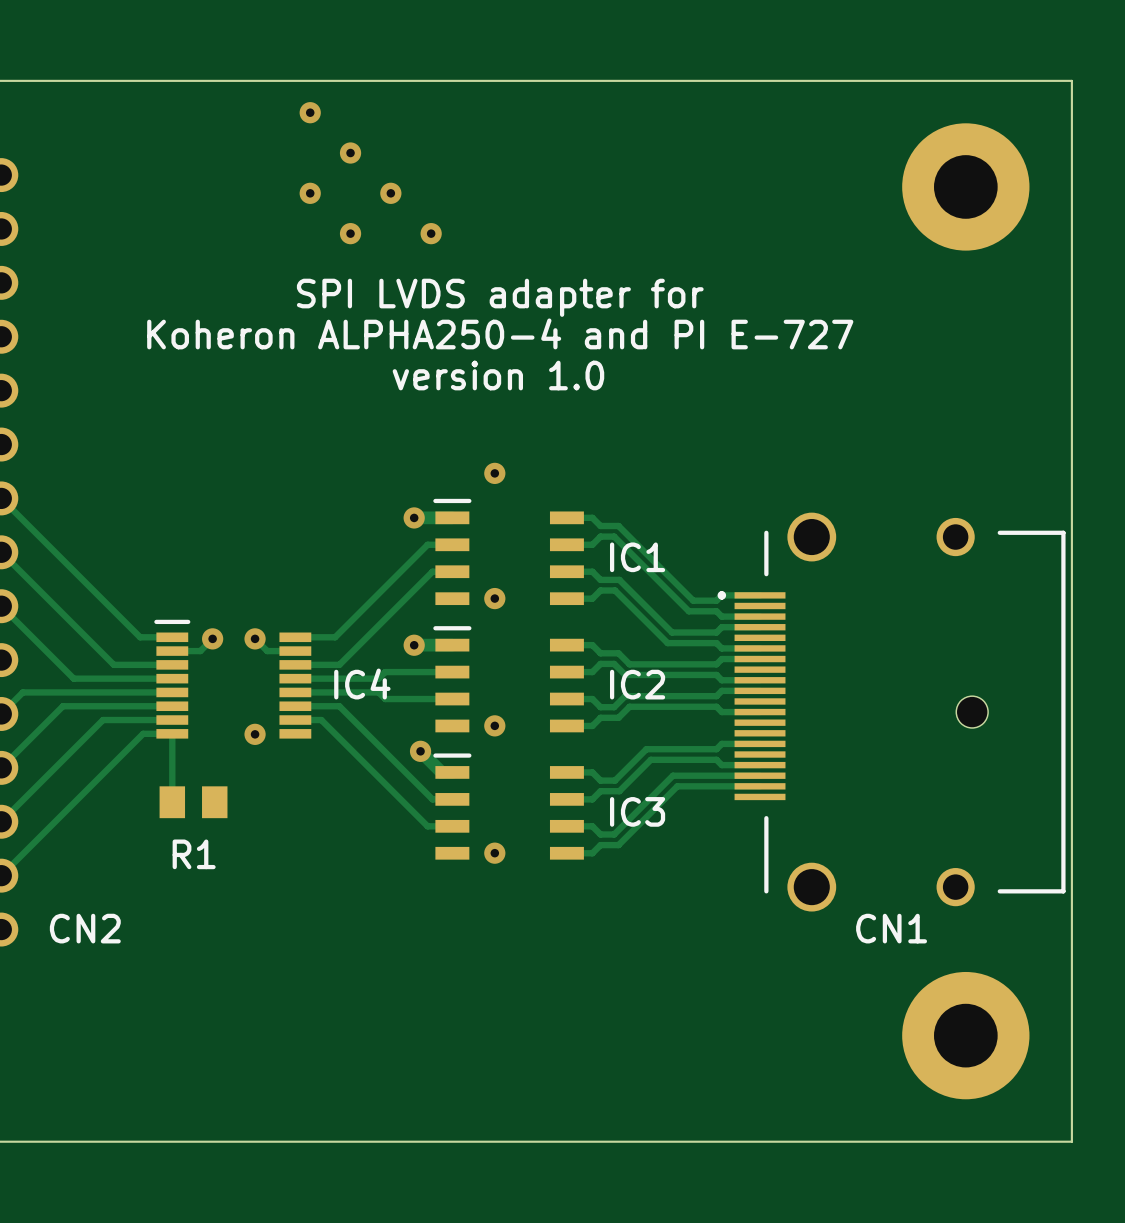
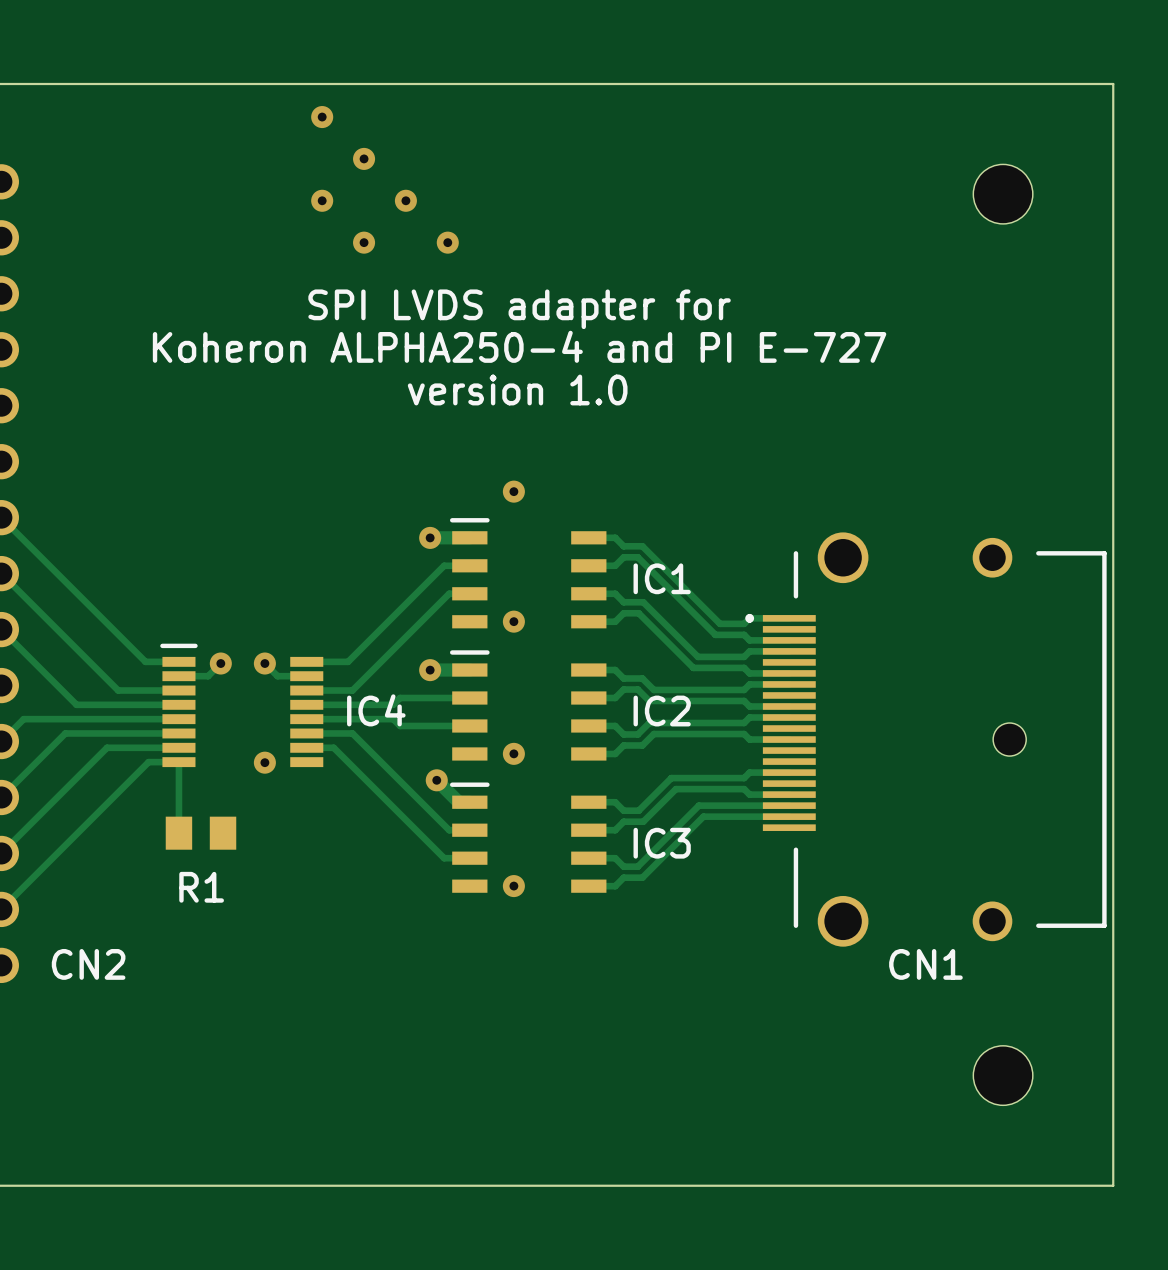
part footprint: [902, 123, 1030, 251] -> [973, 164, 1033, 224]
part footprint: [902, 971, 1030, 1100] -> [973, 1045, 1033, 1106]

